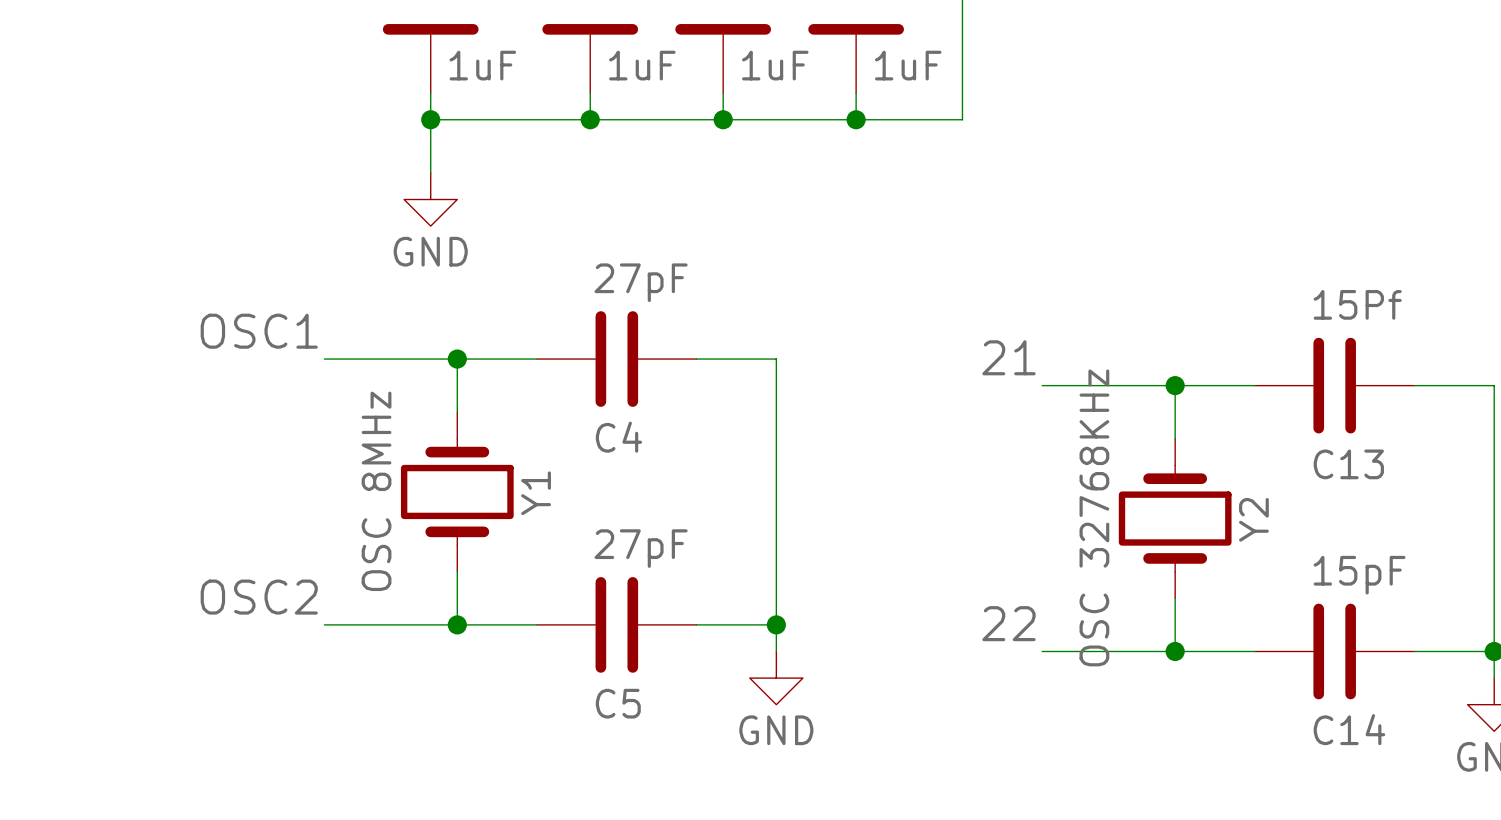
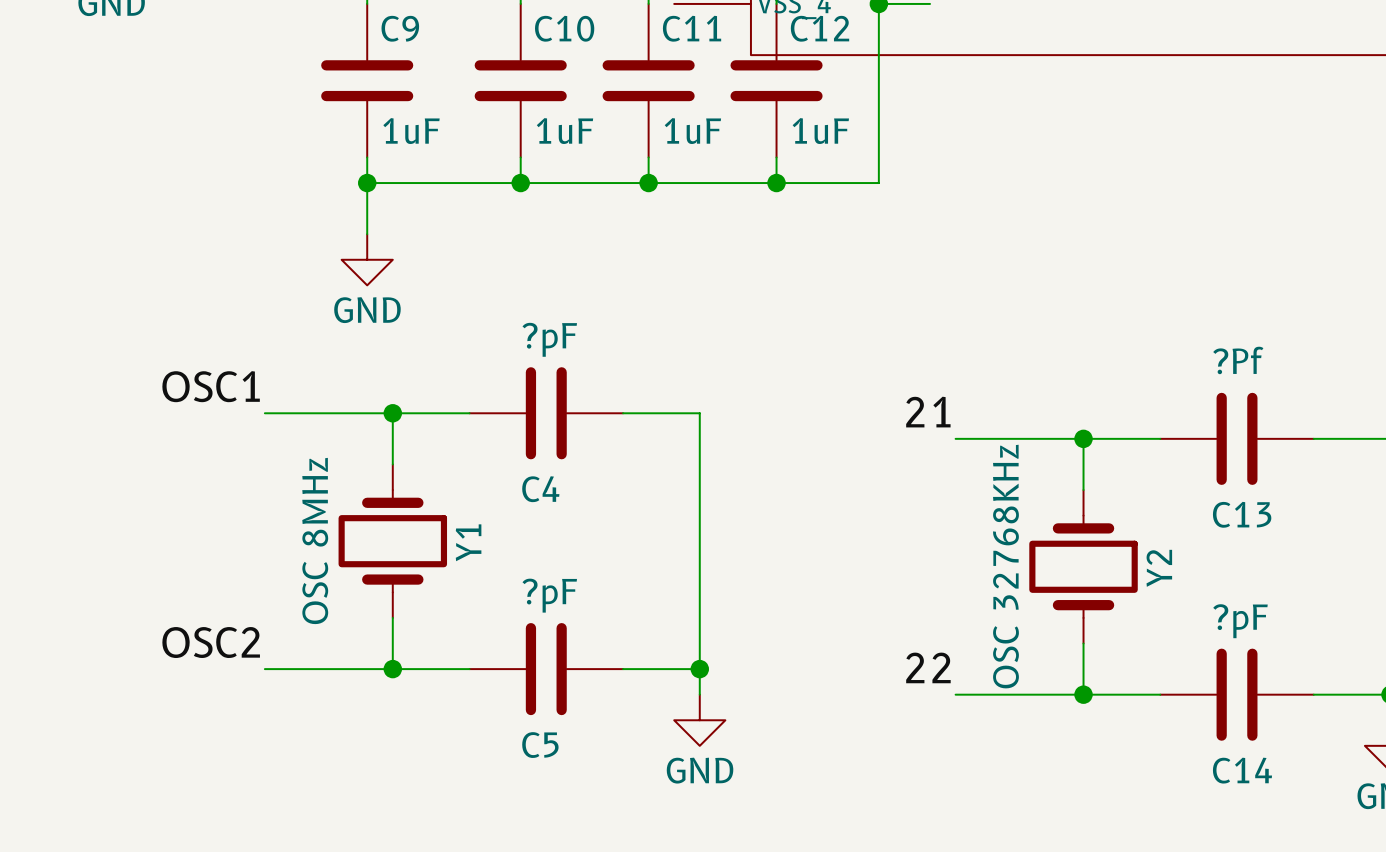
C4 value: 27pF (641, 282) -> ?pF (549, 339)
C13 value: 15Pf (1357, 304) -> ?Pf (1238, 360)
C5 value: 27pF (641, 548) -> ?pF (549, 595)
C14 value: 15pF (1359, 575) -> ?pF (1240, 621)

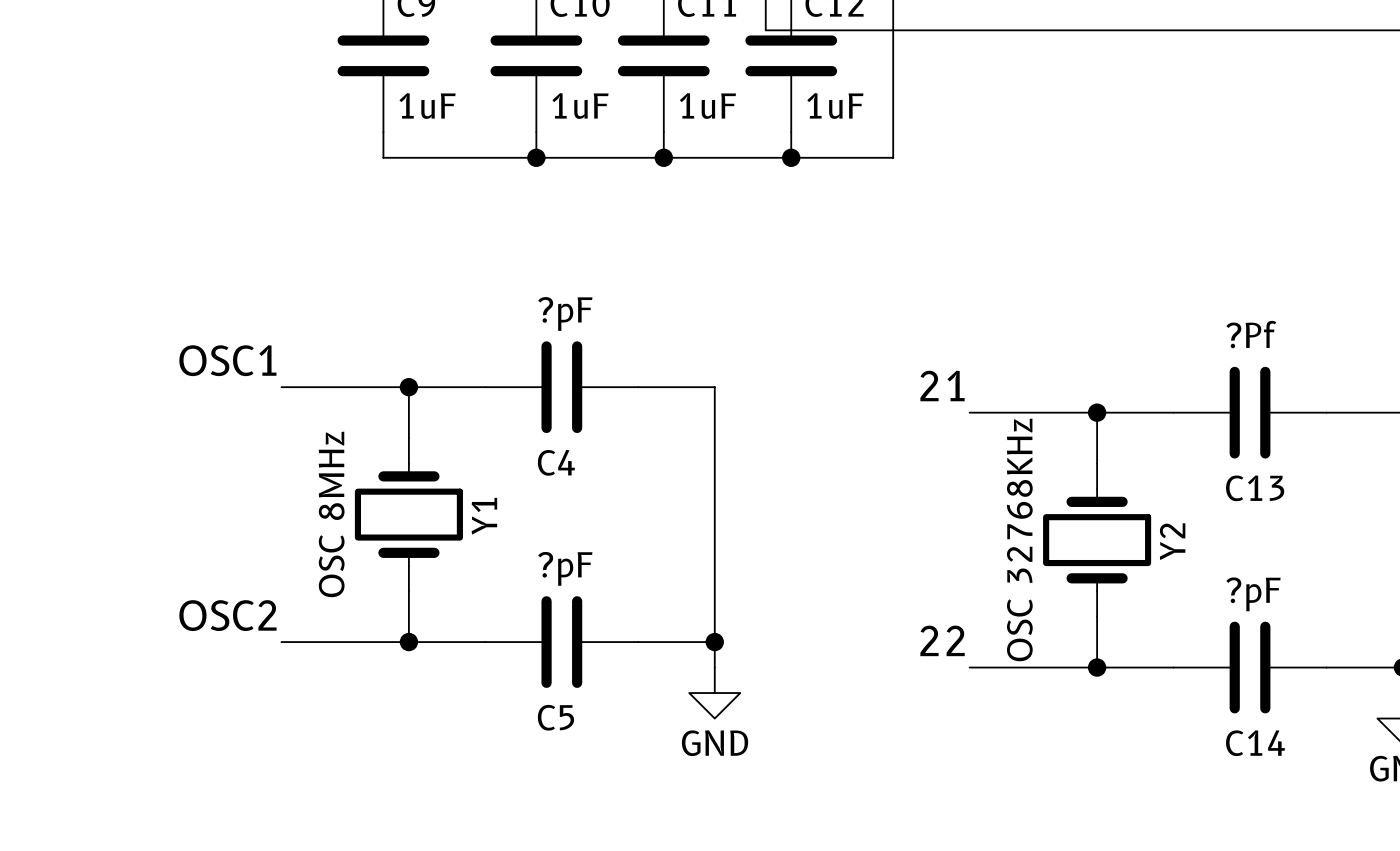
wire: (367, 183) (367, 234) -> none
junction: (367, 183) -> none
power symbol: GND (367, 259) -> none

